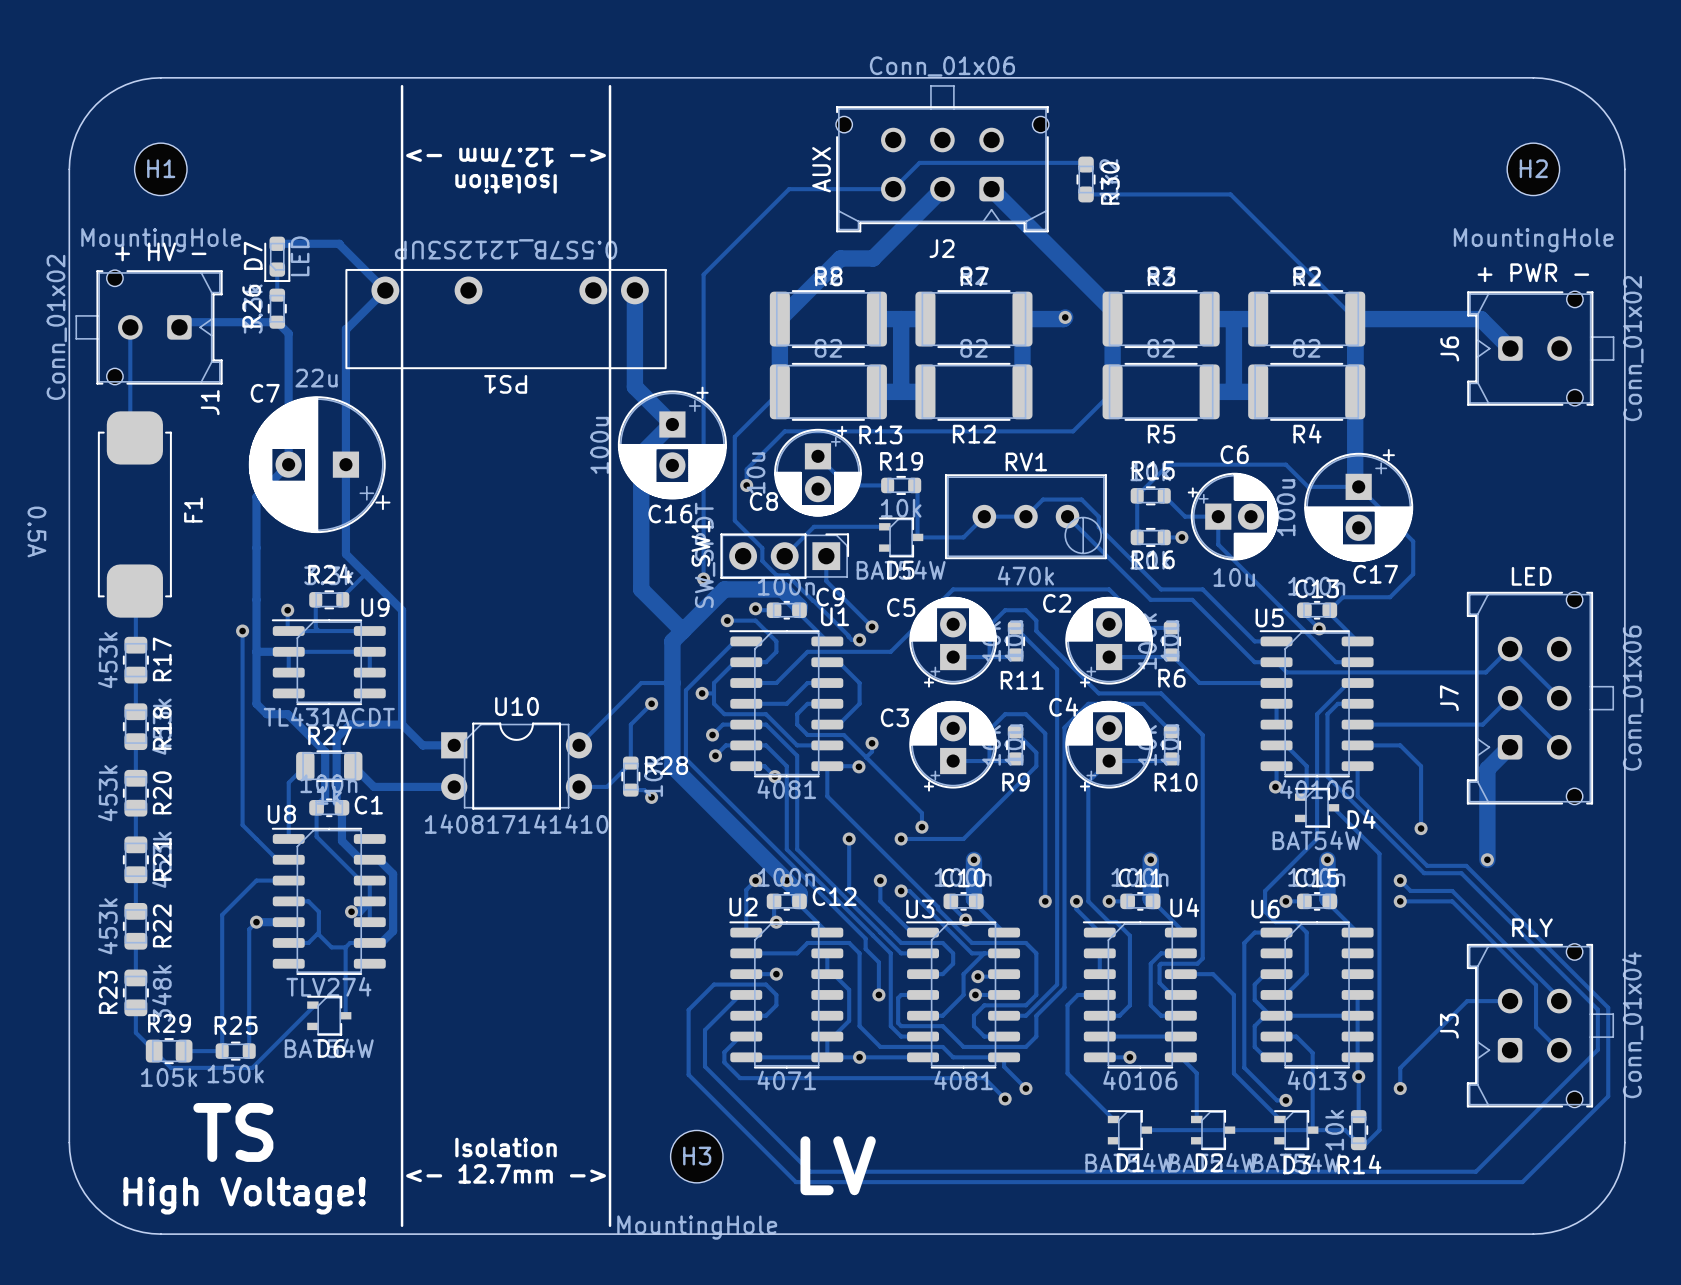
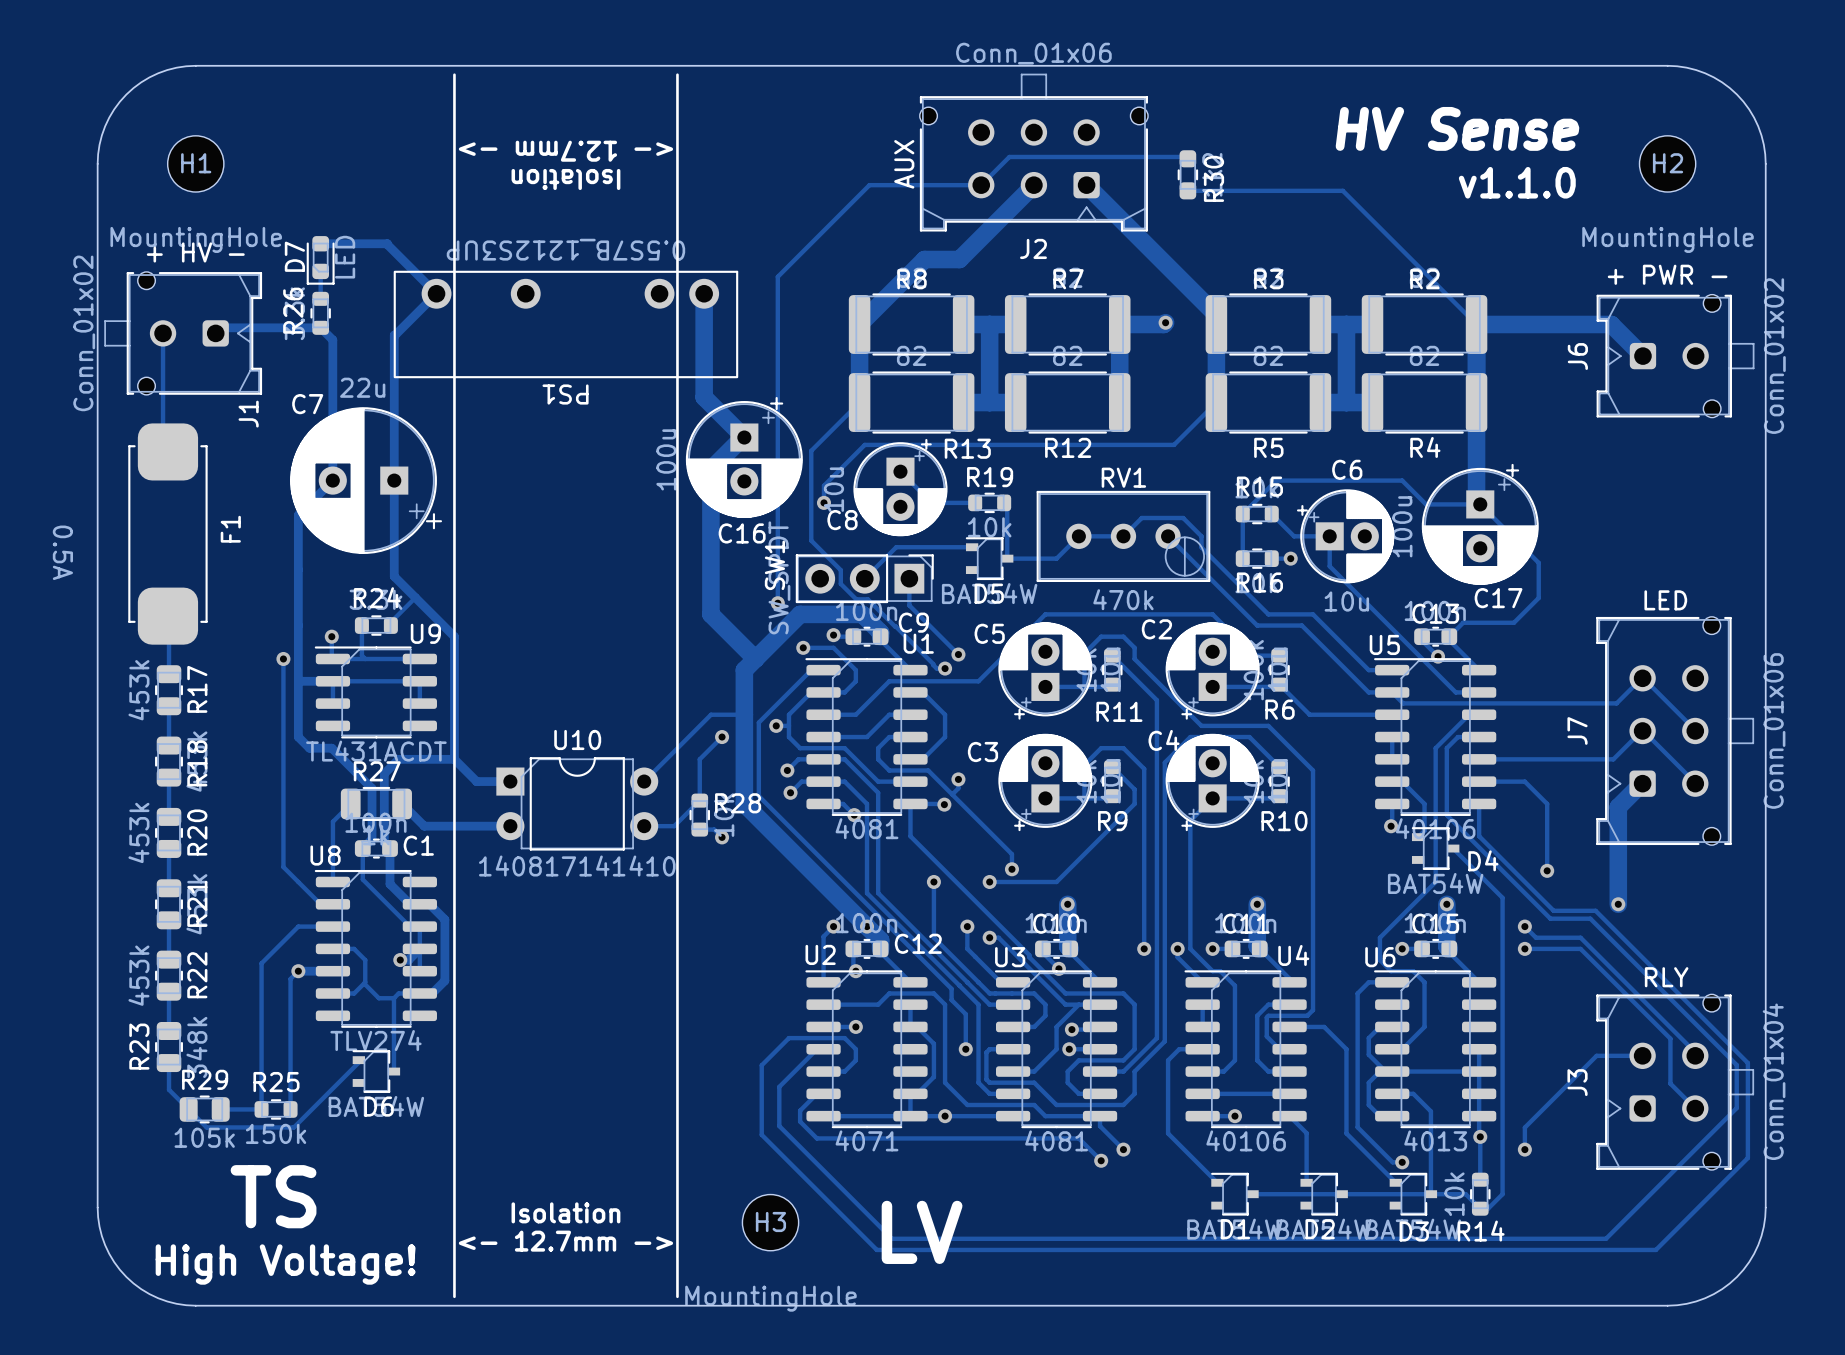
text: none -> HV Sense (1457, 128)
text: none -> v1.1.0 (1517, 182)

